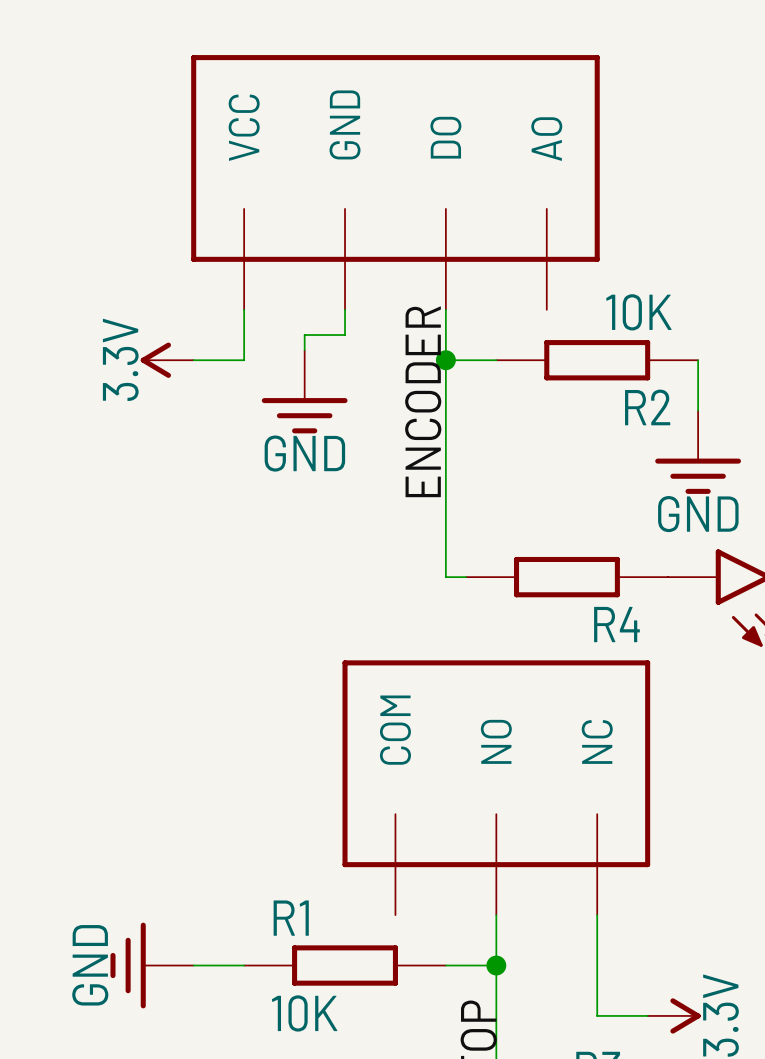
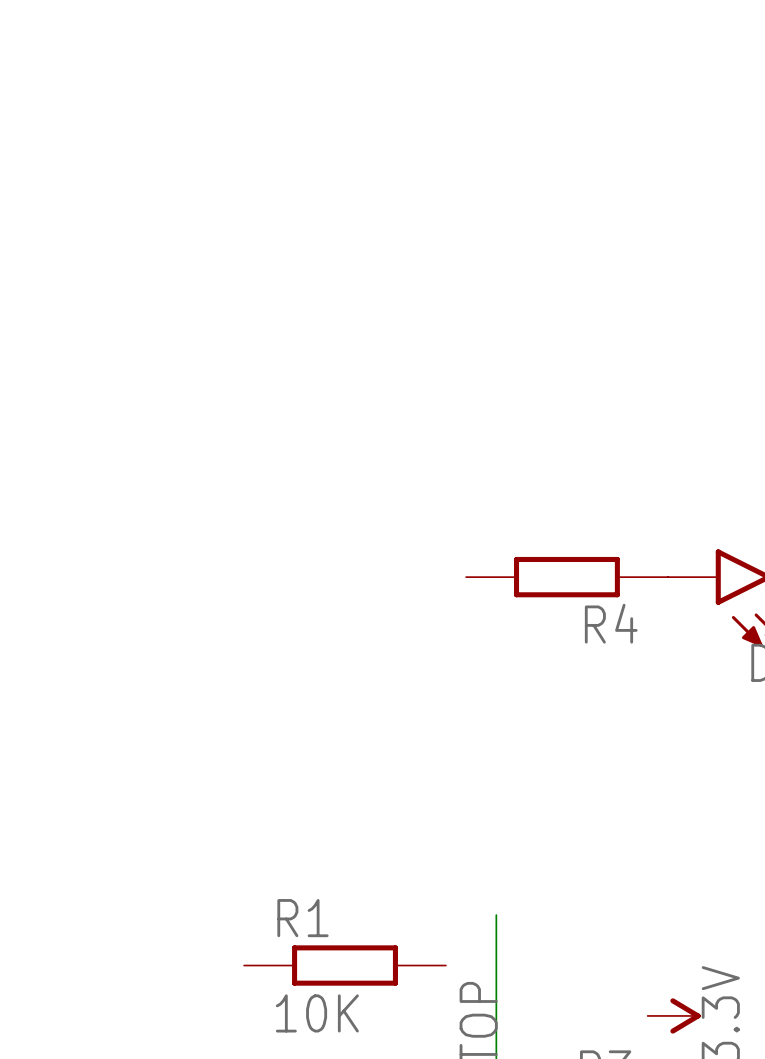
part: (395, 182) -> none
wire: (244, 309) (244, 360) (193, 360) -> none
wire: (345, 309) (345, 335) (304, 335) (304, 350) -> none
wire: (445, 309) (445, 577) (466, 577) -> none
power symbol: 3.3V (167, 360) -> none
wire: (445, 360) (496, 360) -> none
junction: (445, 360) -> none
R2: 10K (597, 360) -> none
wire: (698, 360) (698, 410) -> none
power symbol: GND (304, 391) -> none
label: ENCODER (423, 401) -> none
power symbol: GND (698, 452) -> none
part: (496, 787) -> none
wire: (597, 915) (597, 1015) (647, 1015) -> none
power symbol: GND (152, 965) -> none
wire: (193, 965) (244, 965) -> none
wire: (445, 965) (496, 965) -> none
junction: (496, 965) -> none

